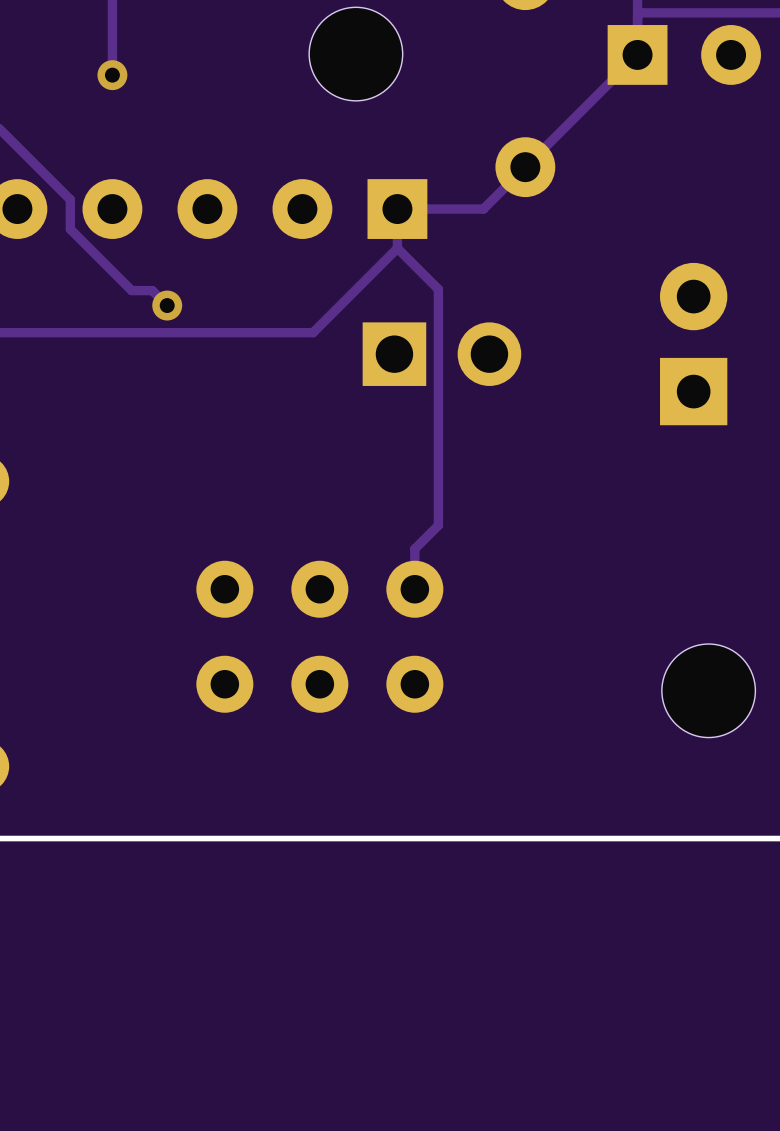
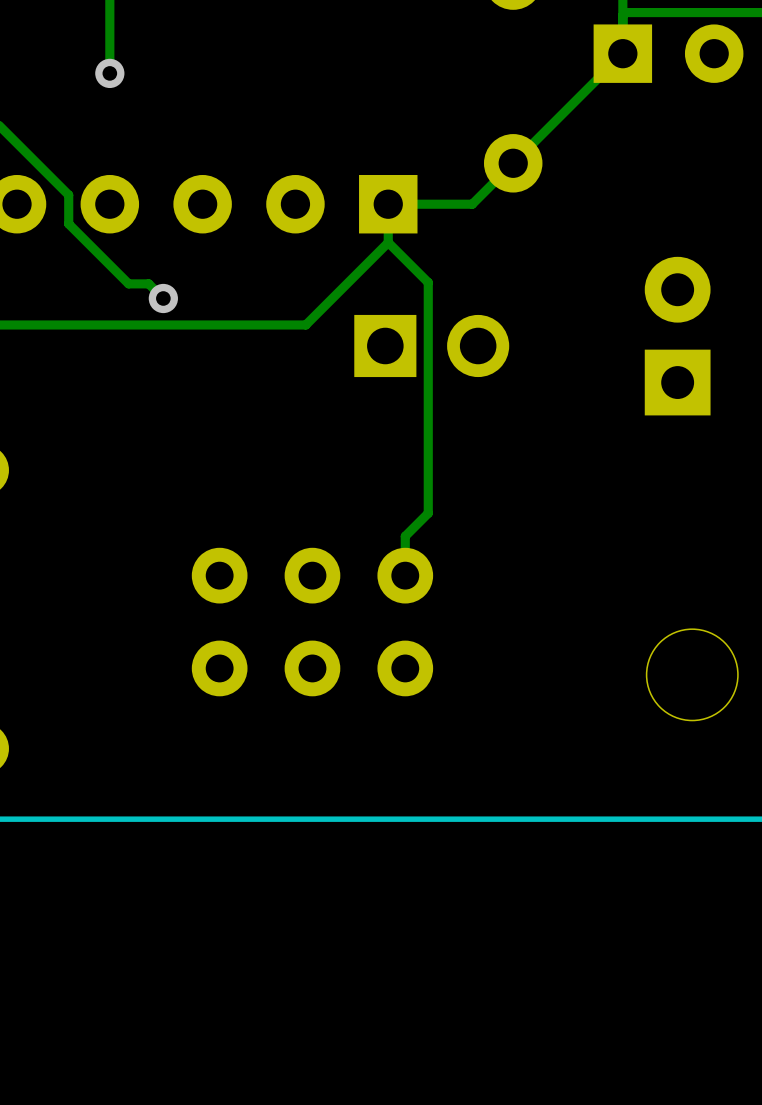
part: (355, 54) -> none

